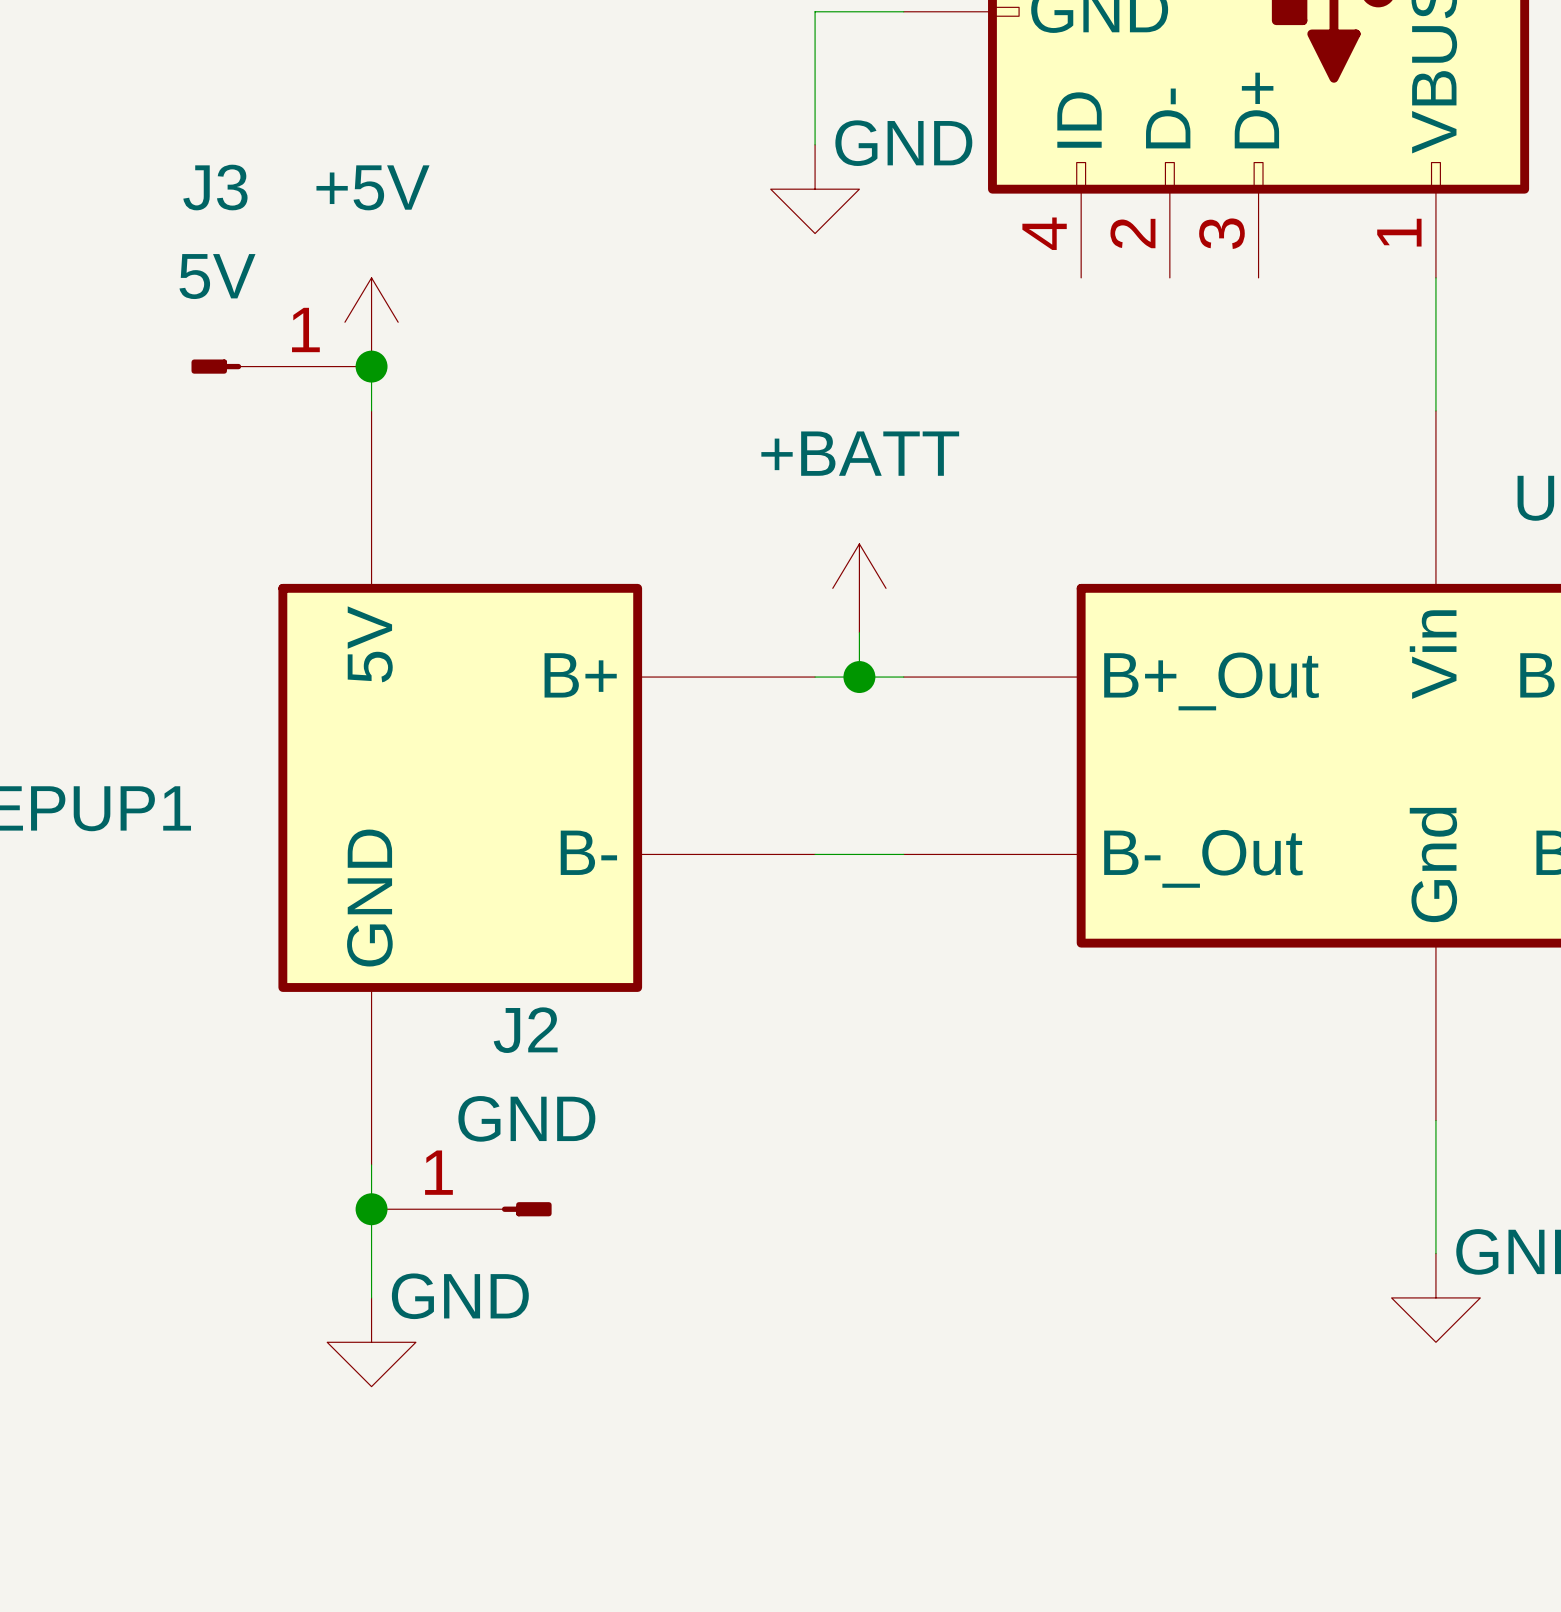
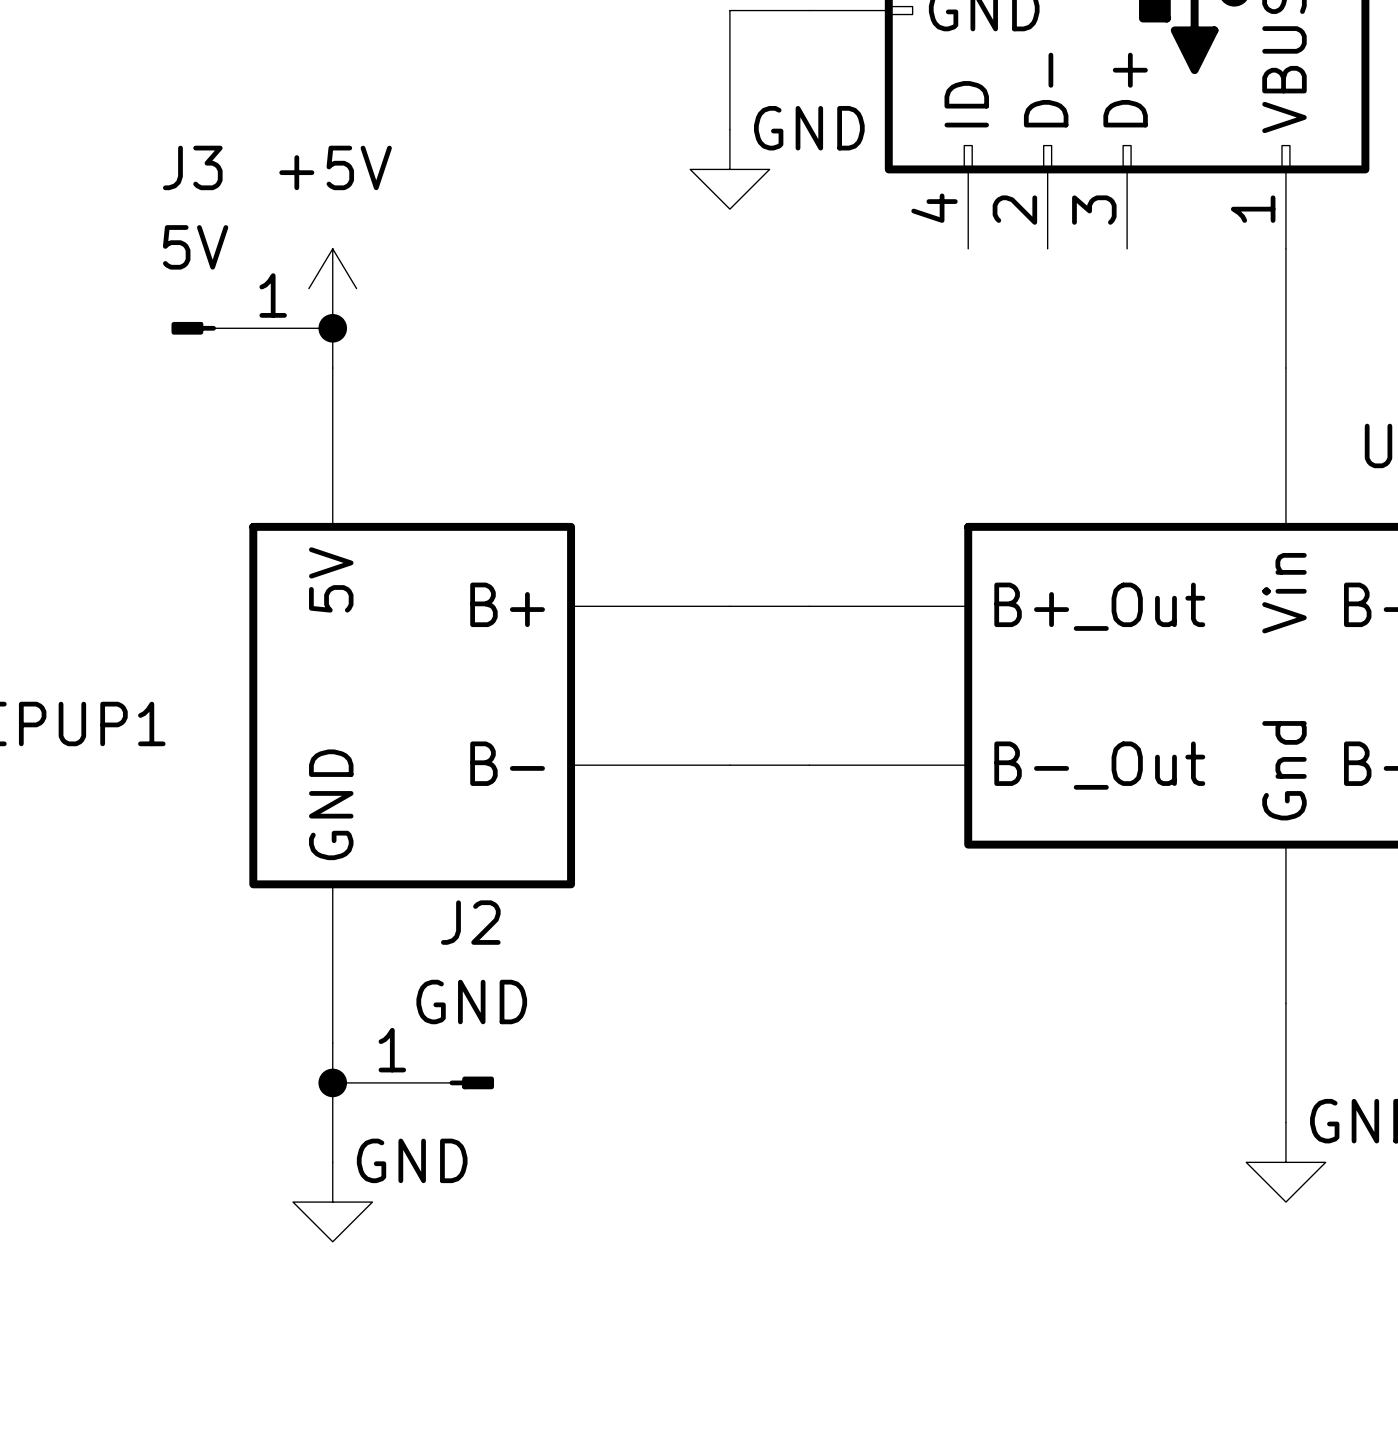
power symbol: +BATT (859, 588) -> none
wire: (859, 632) (859, 677) -> none
junction: (859, 677) -> none

